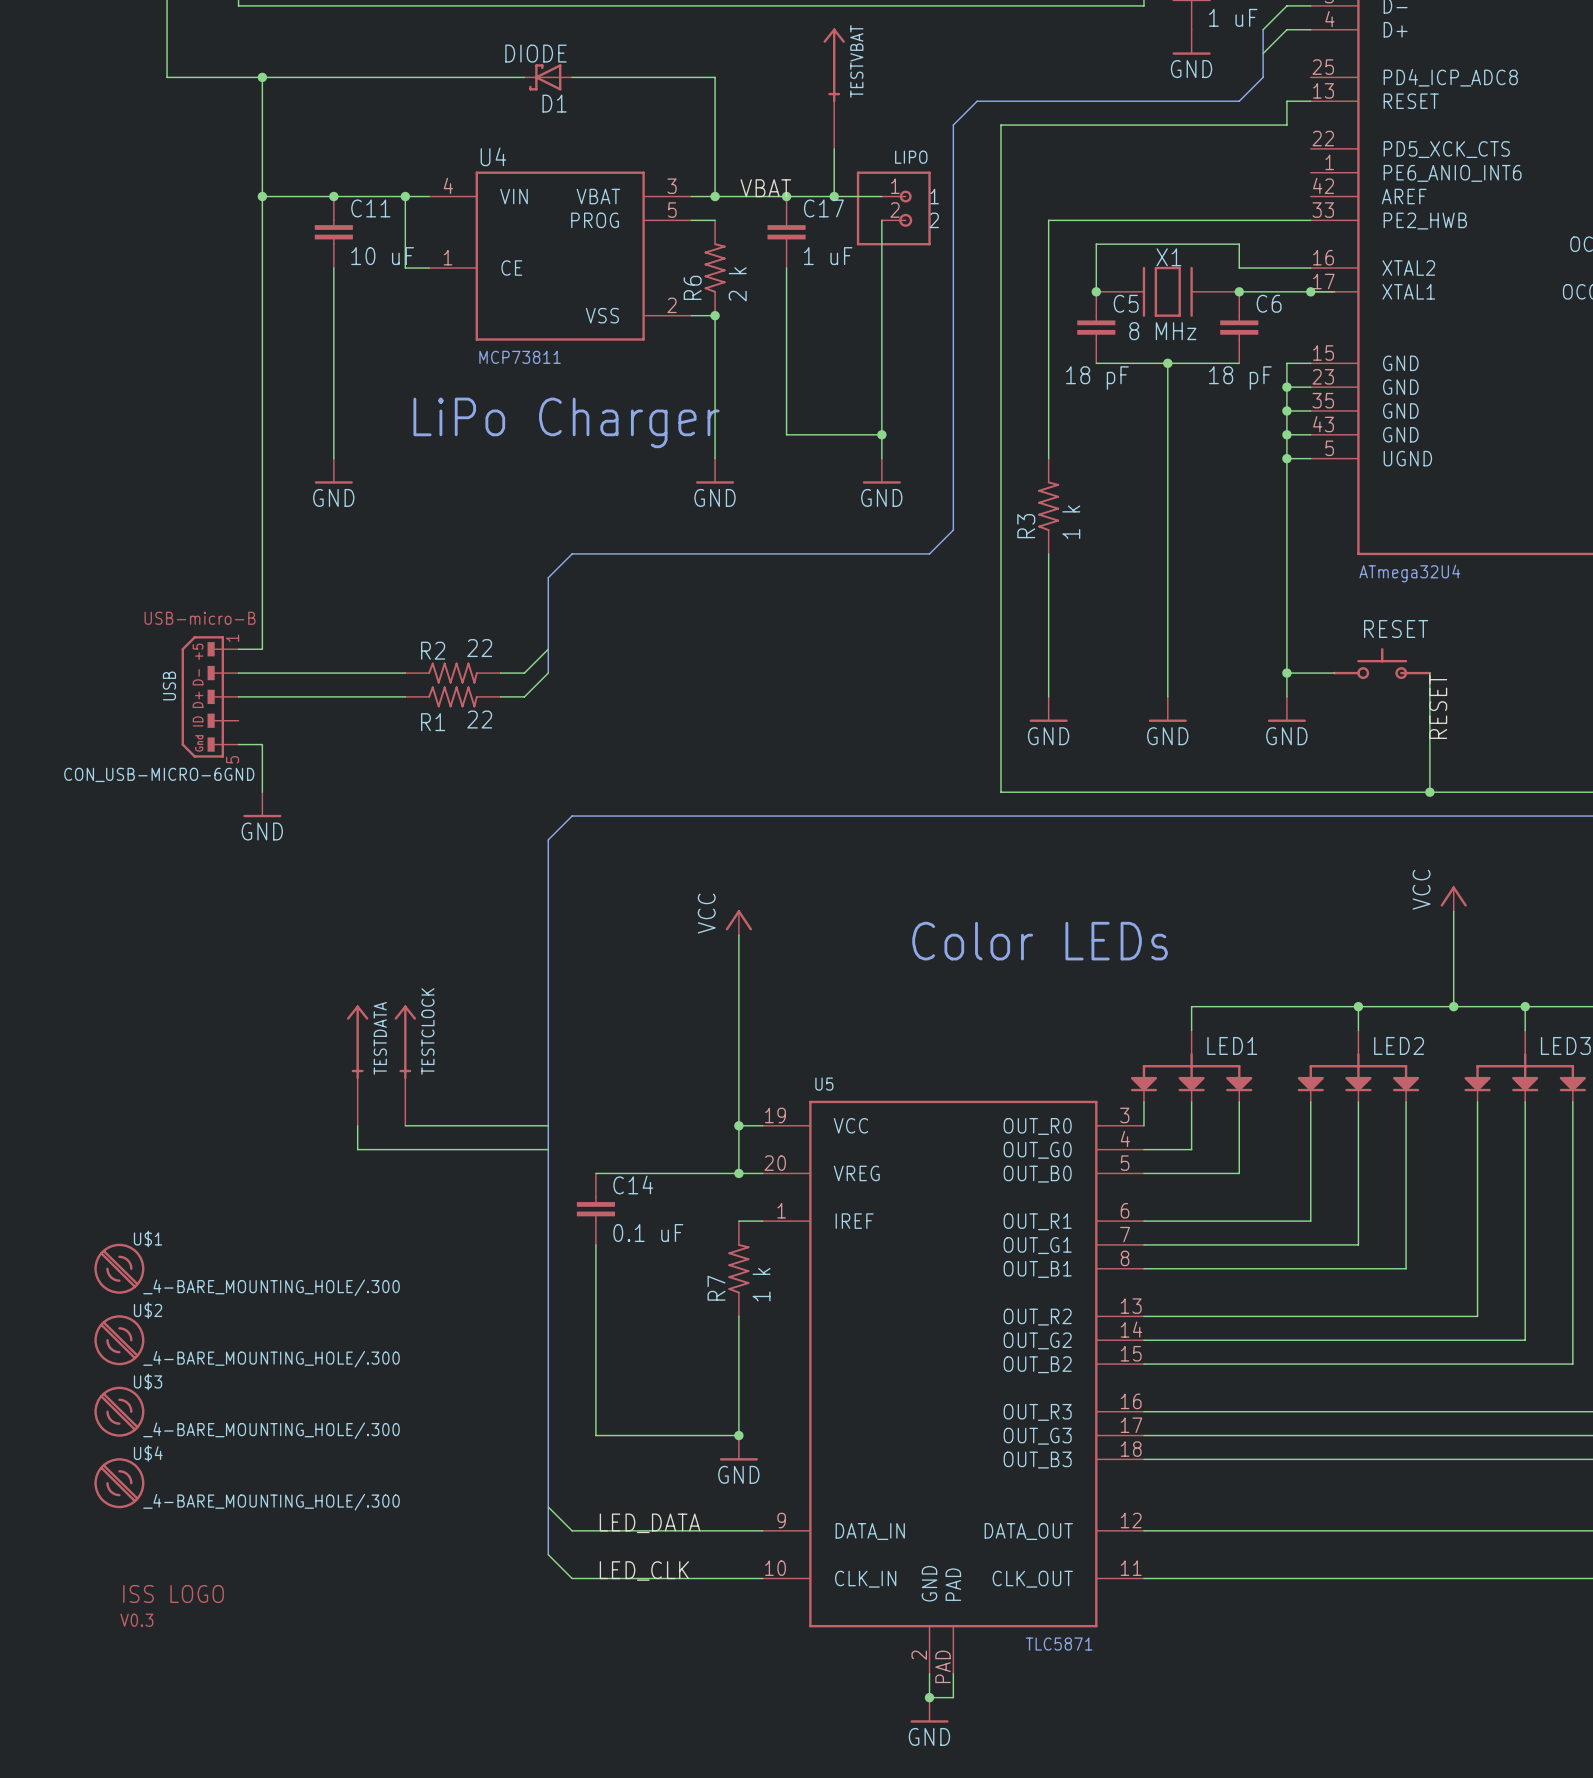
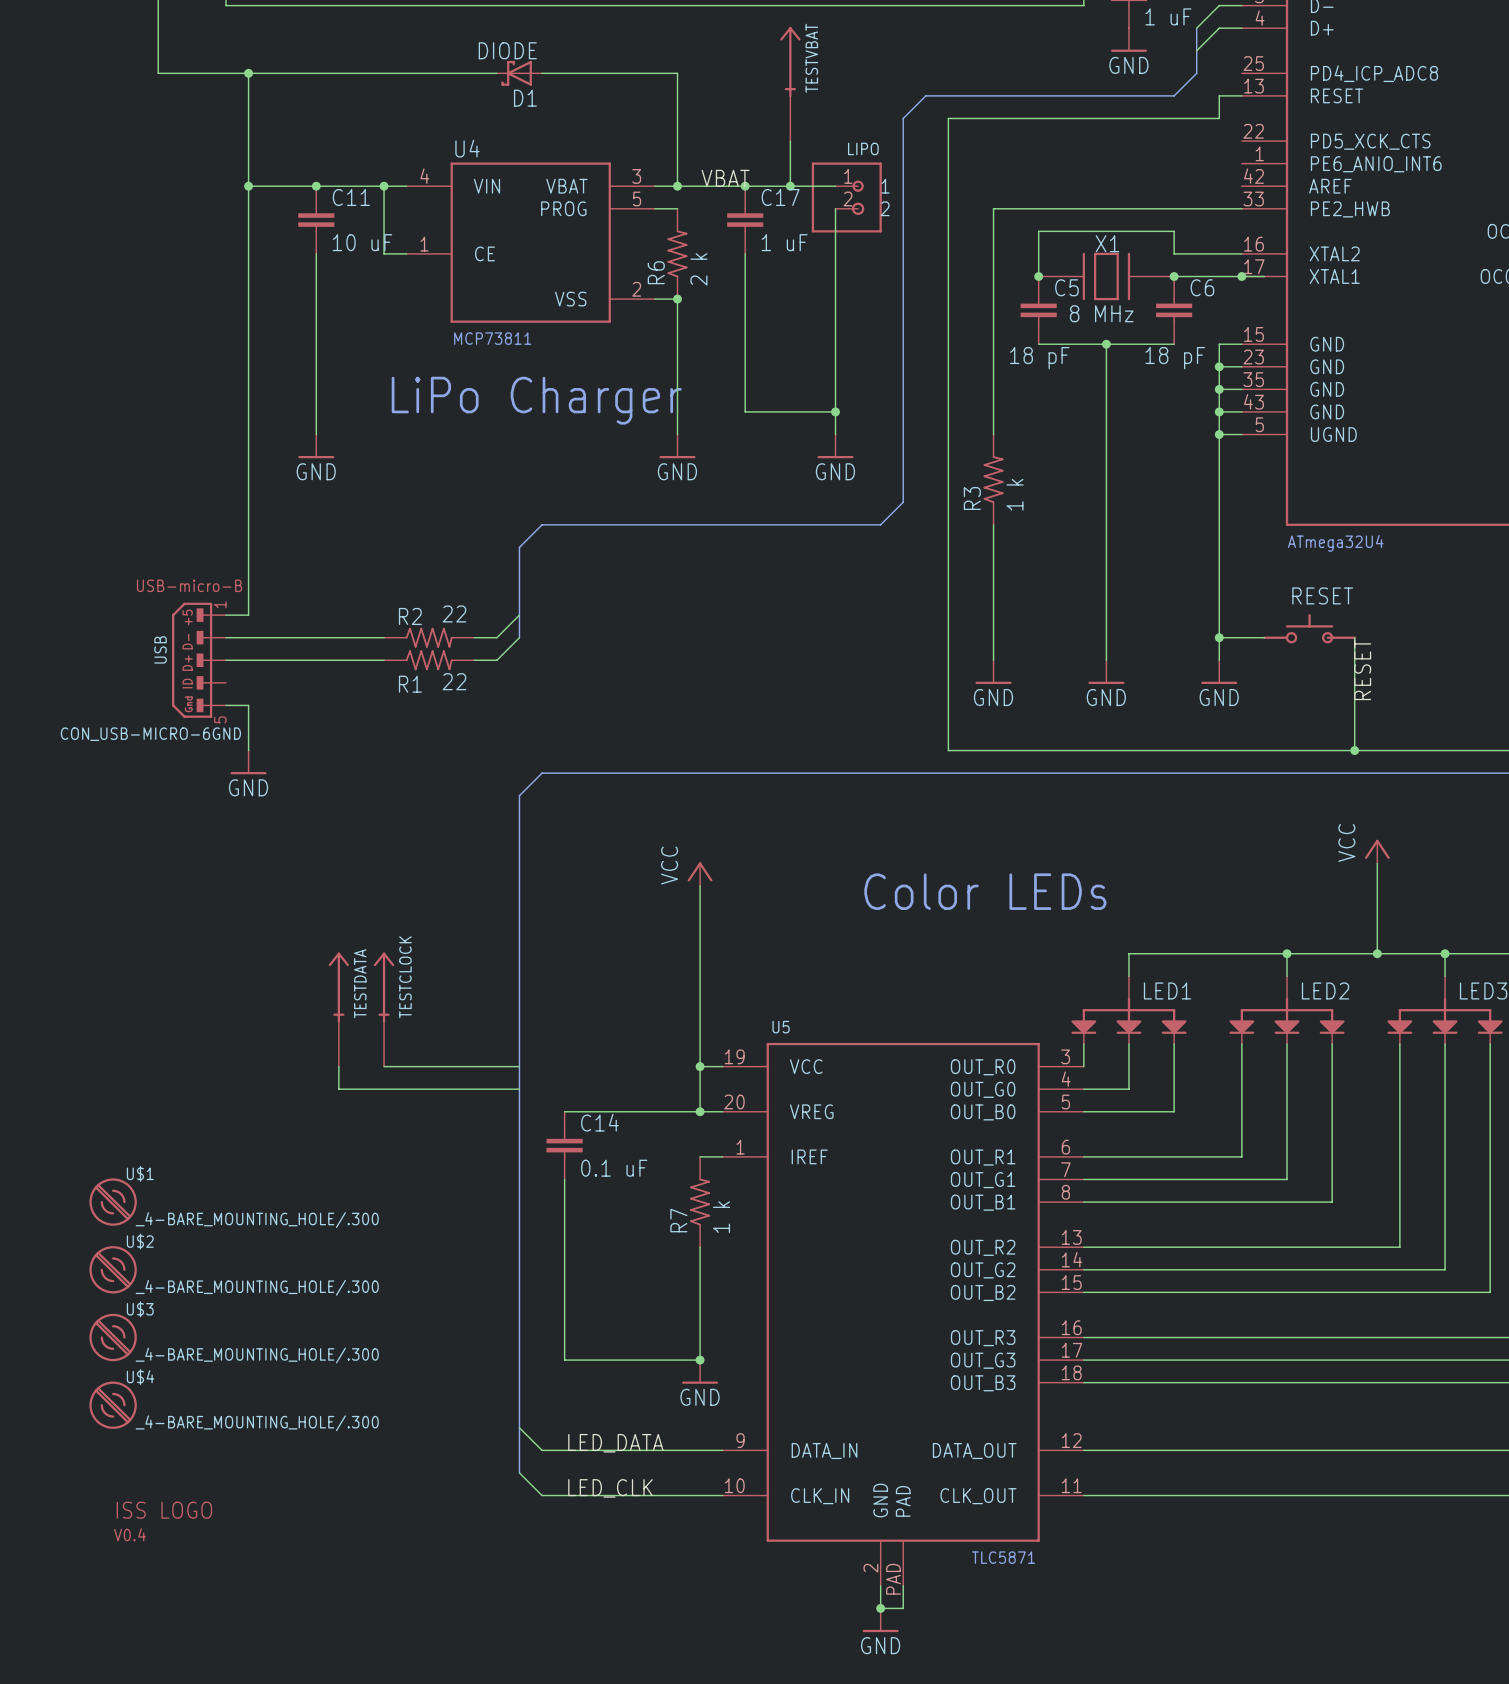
part value: V0.3 (136, 1620) -> V0.4 (129, 1534)

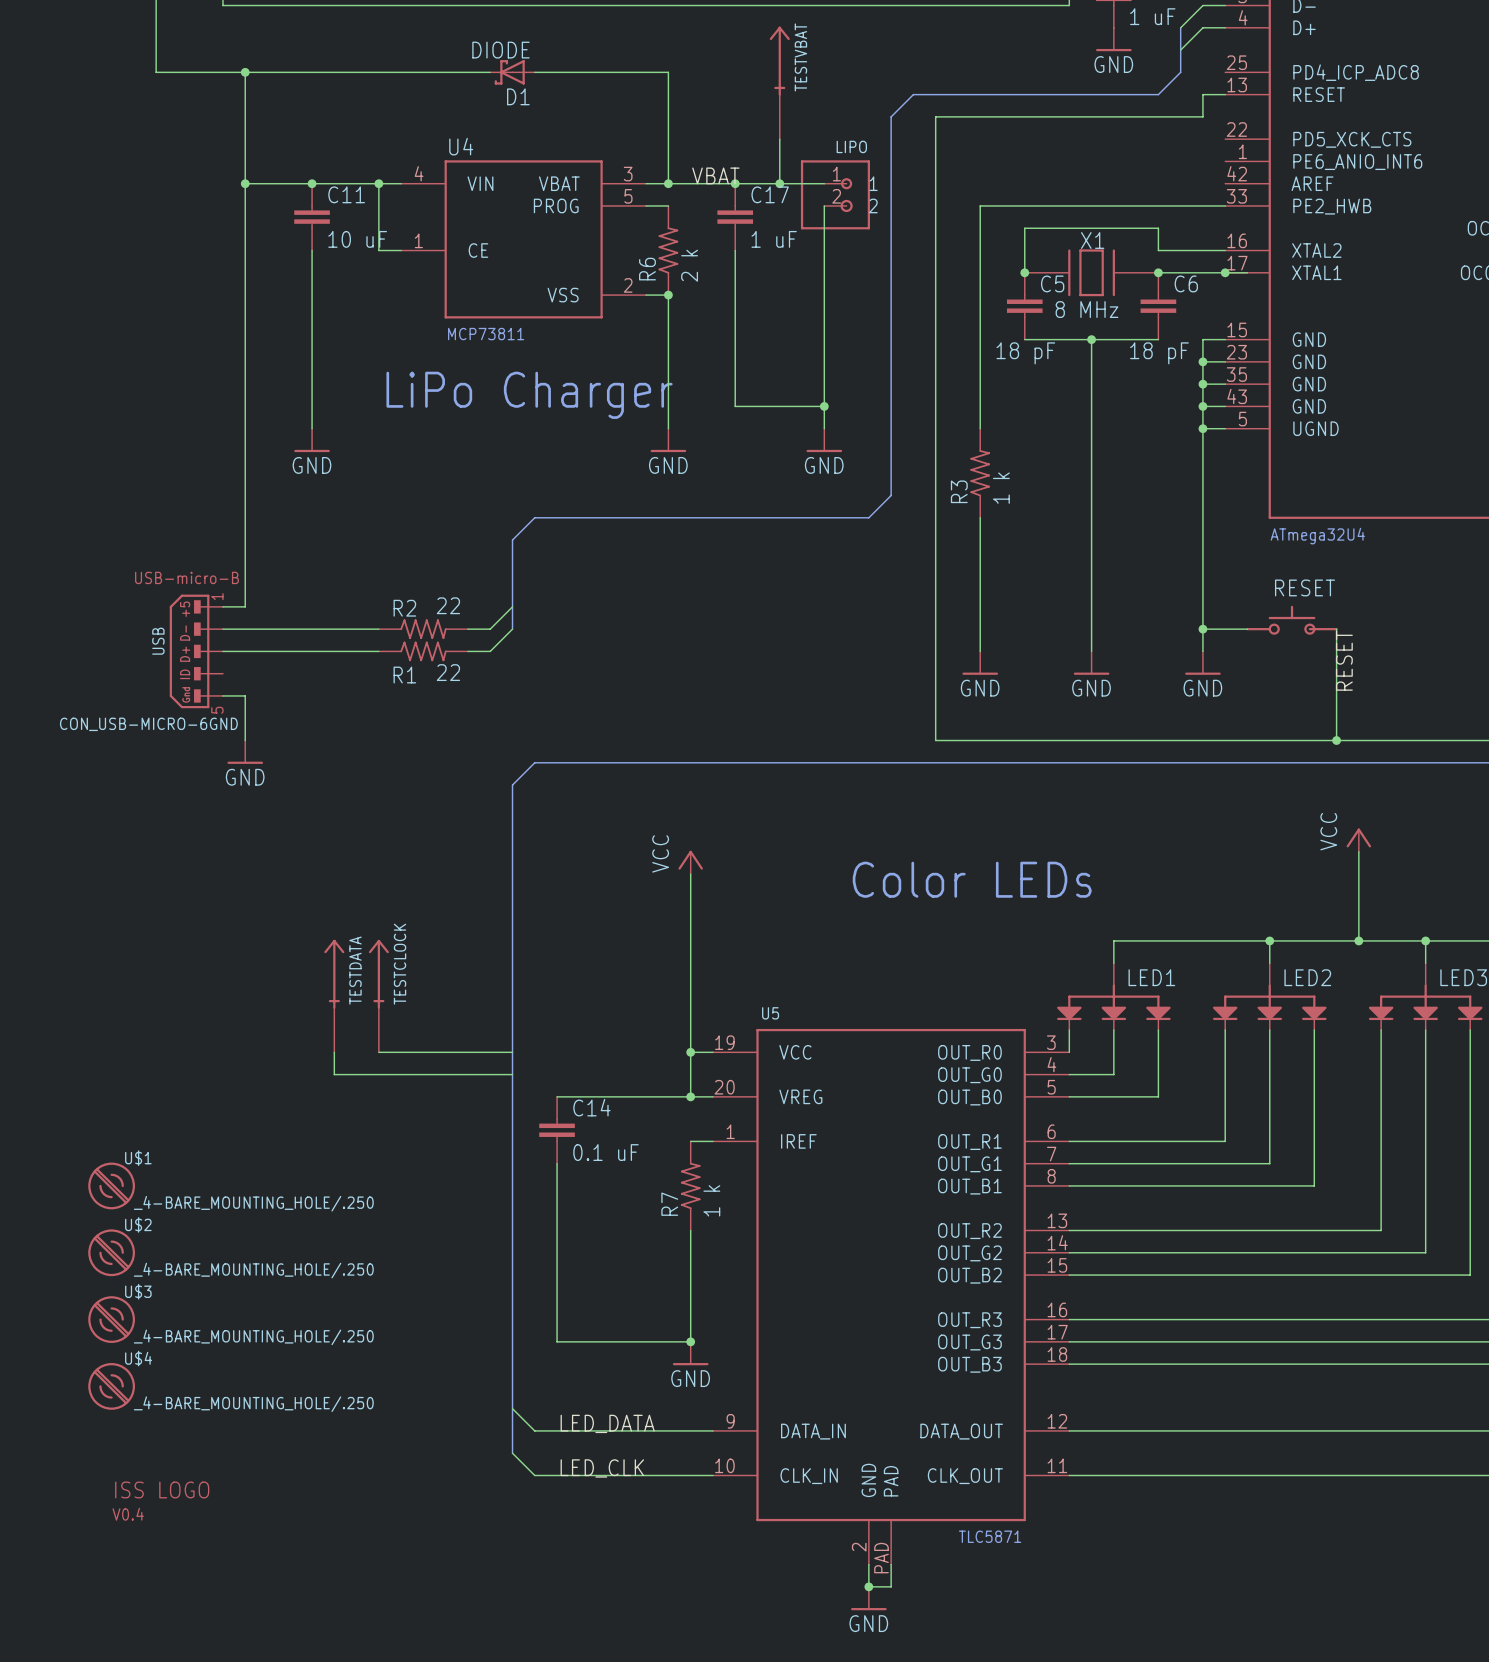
U$1 value: _4-BARE_MOUNTING_HOLE/.300 (257, 1220) -> _4-BARE_MOUNTING_HOLE/.250 (253, 1203)
U$2 value: _4-BARE_MOUNTING_HOLE/.300 (257, 1287) -> _4-BARE_MOUNTING_HOLE/.250 (253, 1270)
U$3 value: _4-BARE_MOUNTING_HOLE/.300 (257, 1355) -> _4-BARE_MOUNTING_HOLE/.250 (253, 1337)
U$4 value: _4-BARE_MOUNTING_HOLE/.300 (257, 1423) -> _4-BARE_MOUNTING_HOLE/.250 (253, 1404)

